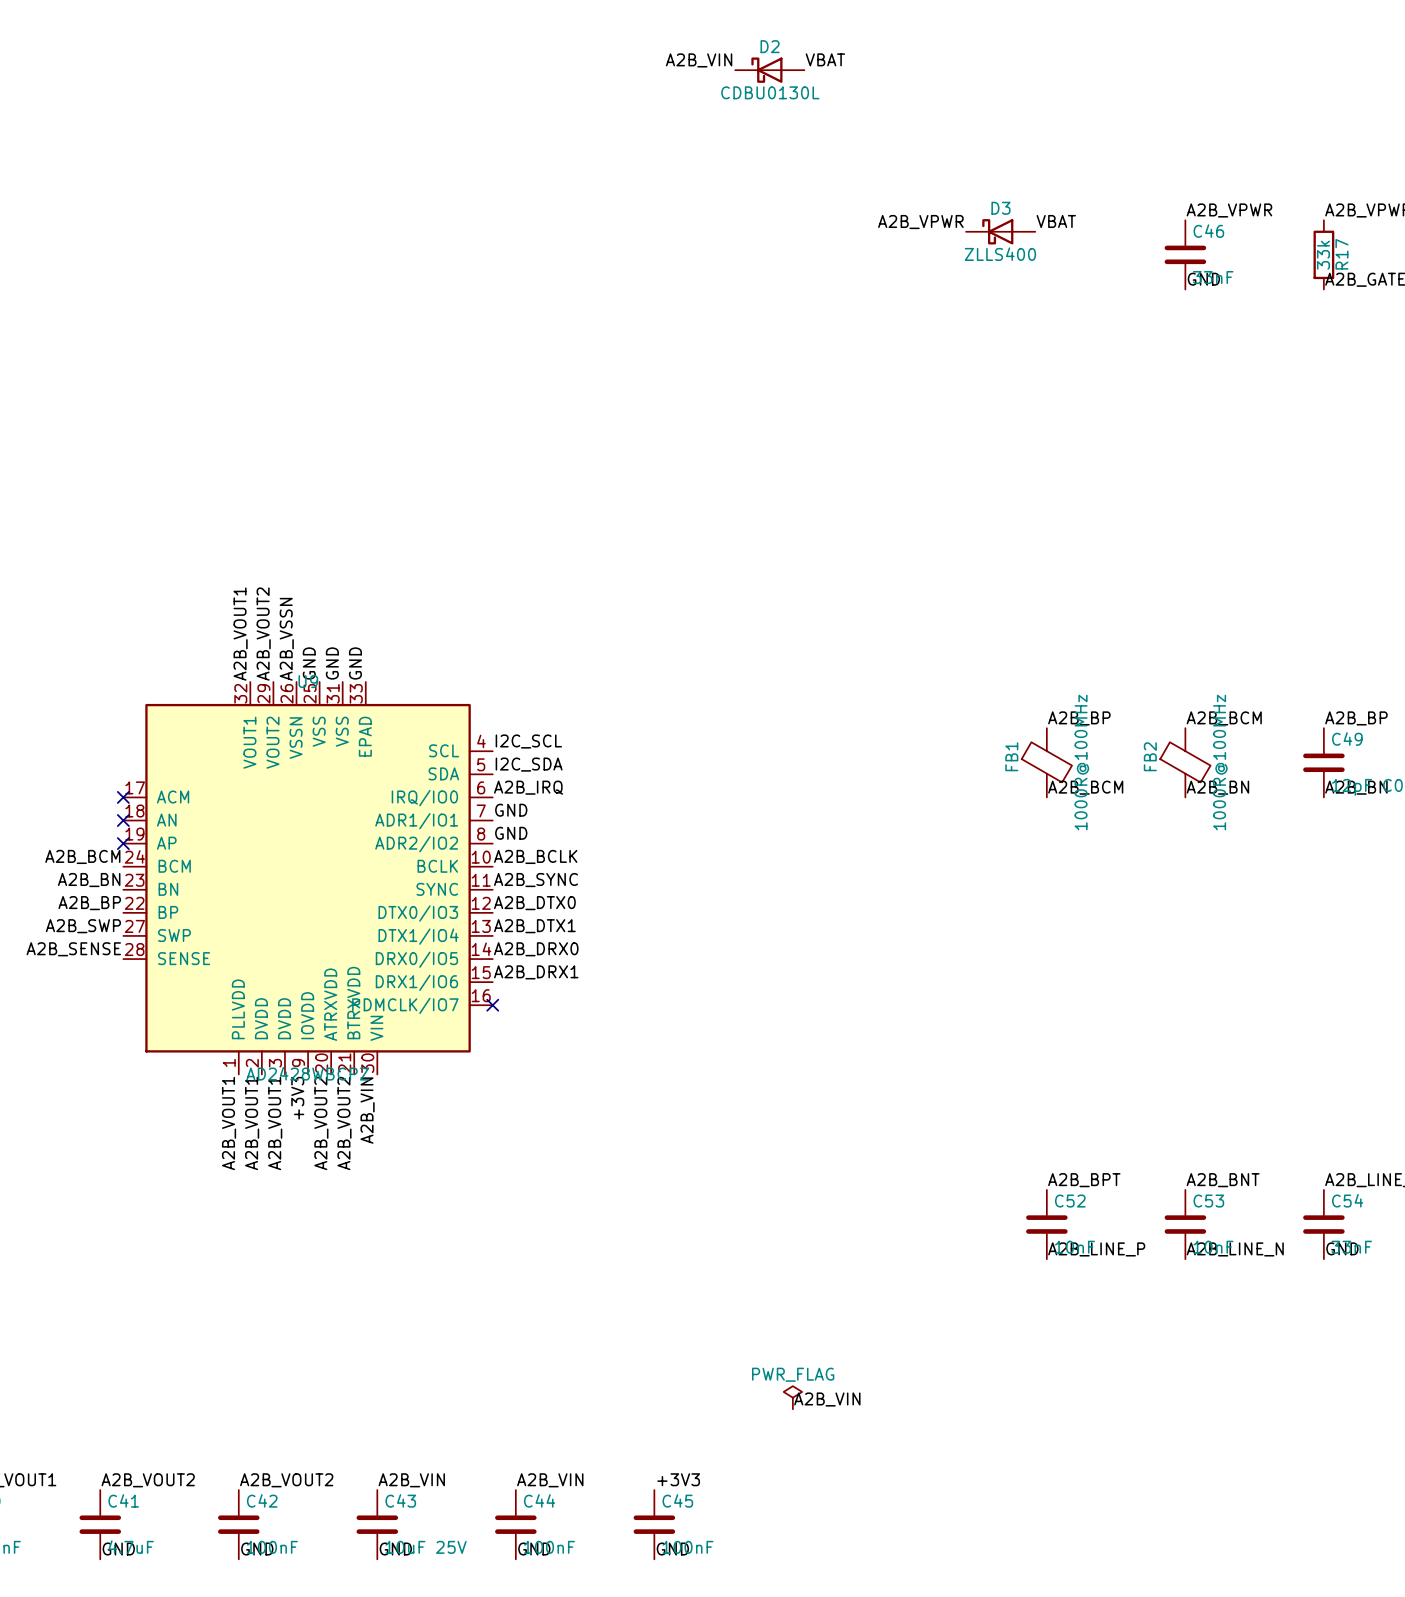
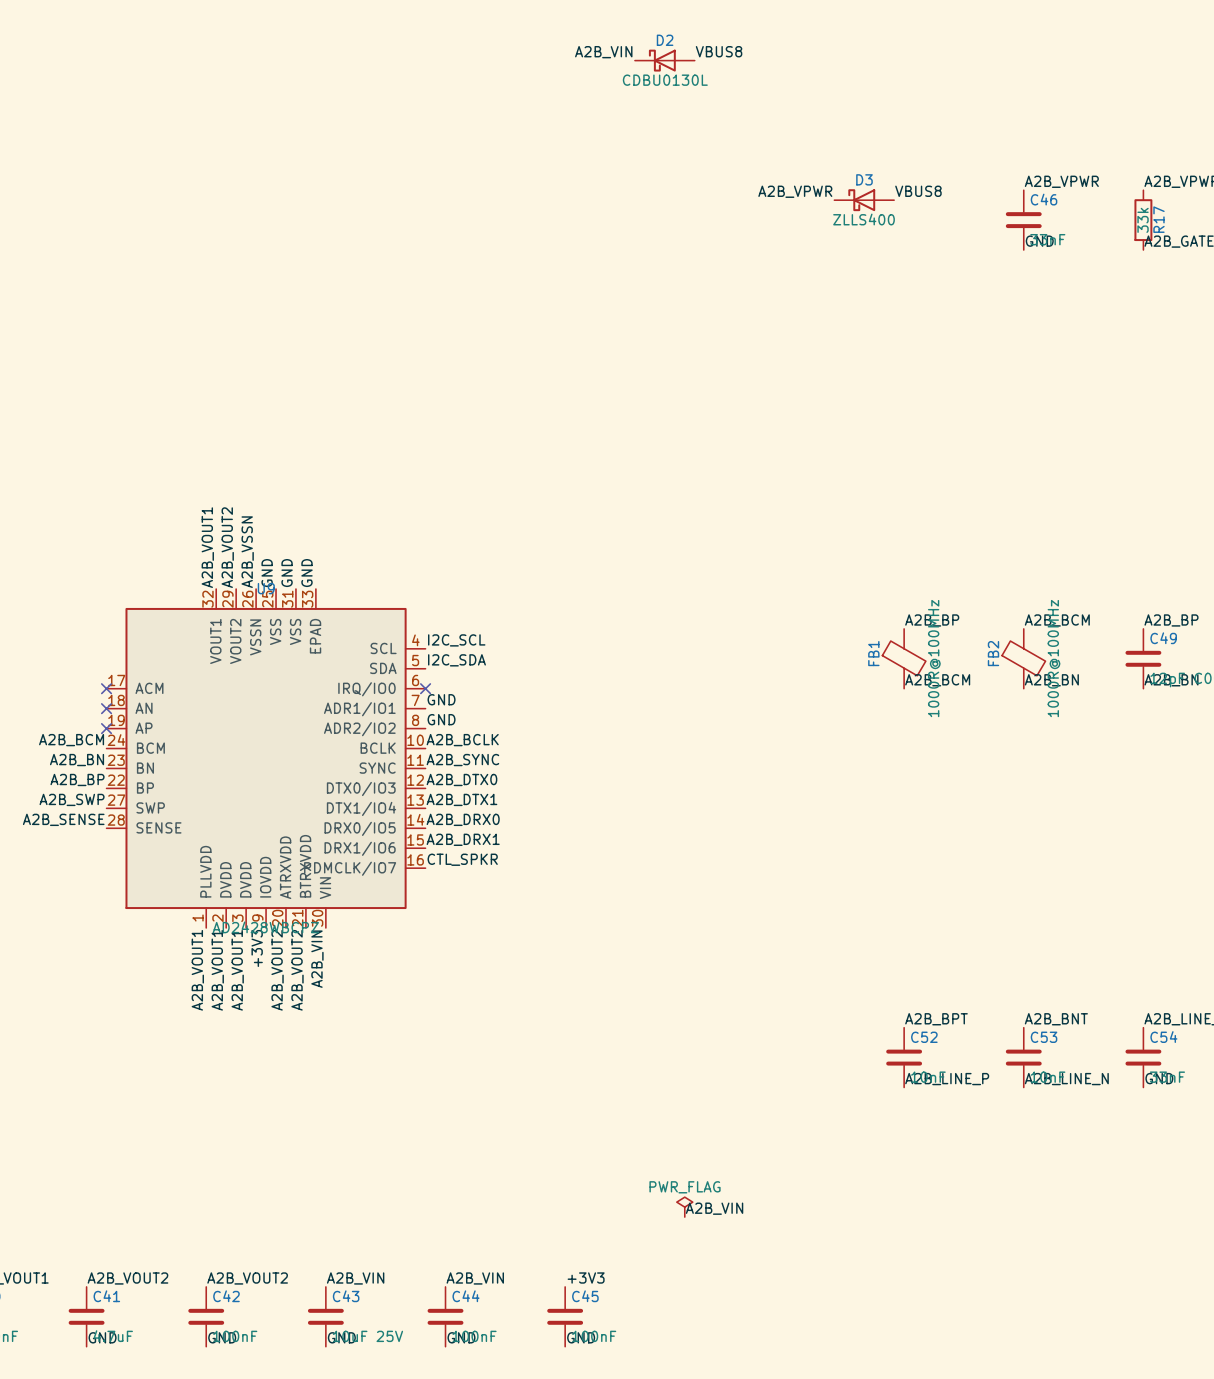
label: VBAT (825, 59) -> VBUS8 (719, 51)
label: VBAT (1056, 221) -> VBUS8 (918, 191)
label: A2B_IRQ (528, 787) -> none
no-connect mark: none -> (425, 688)
label: none -> CTL_SPKR (462, 859)
no-connect mark: (492, 1005) -> none

